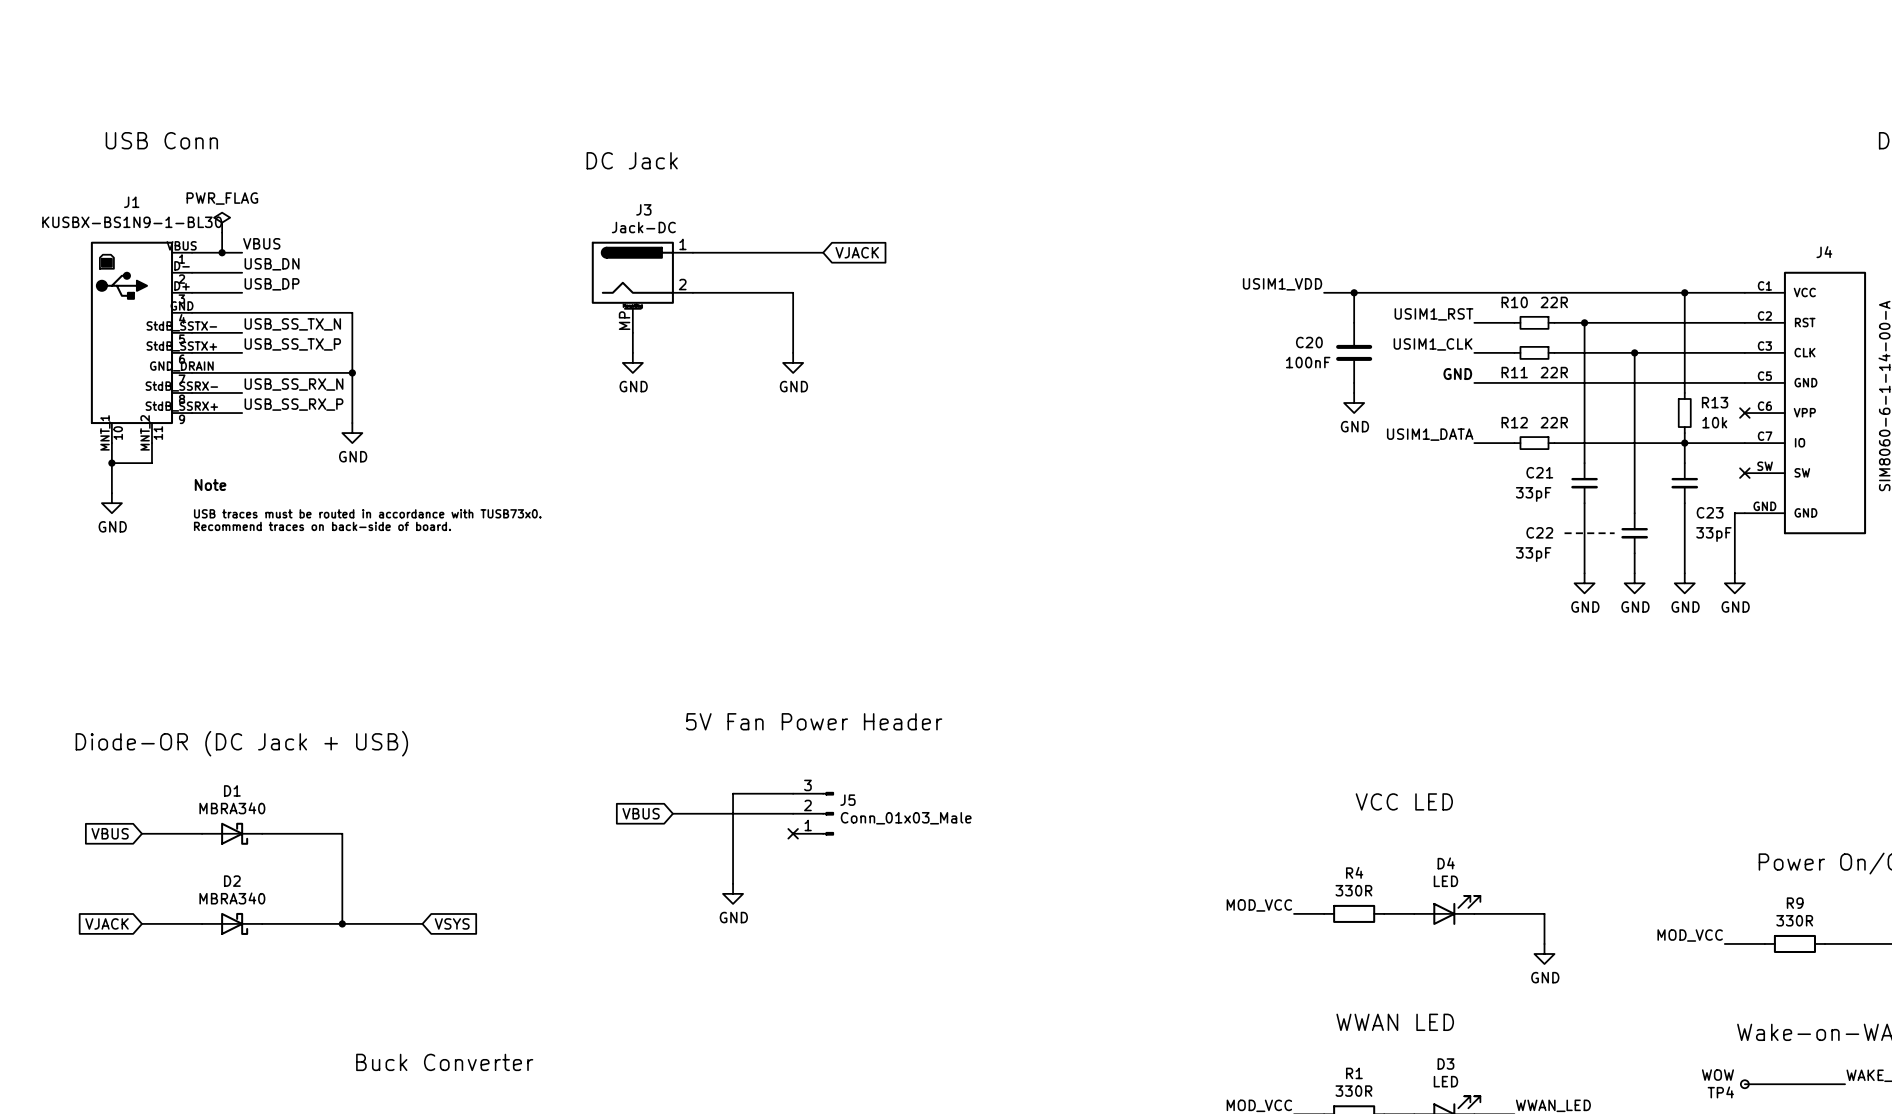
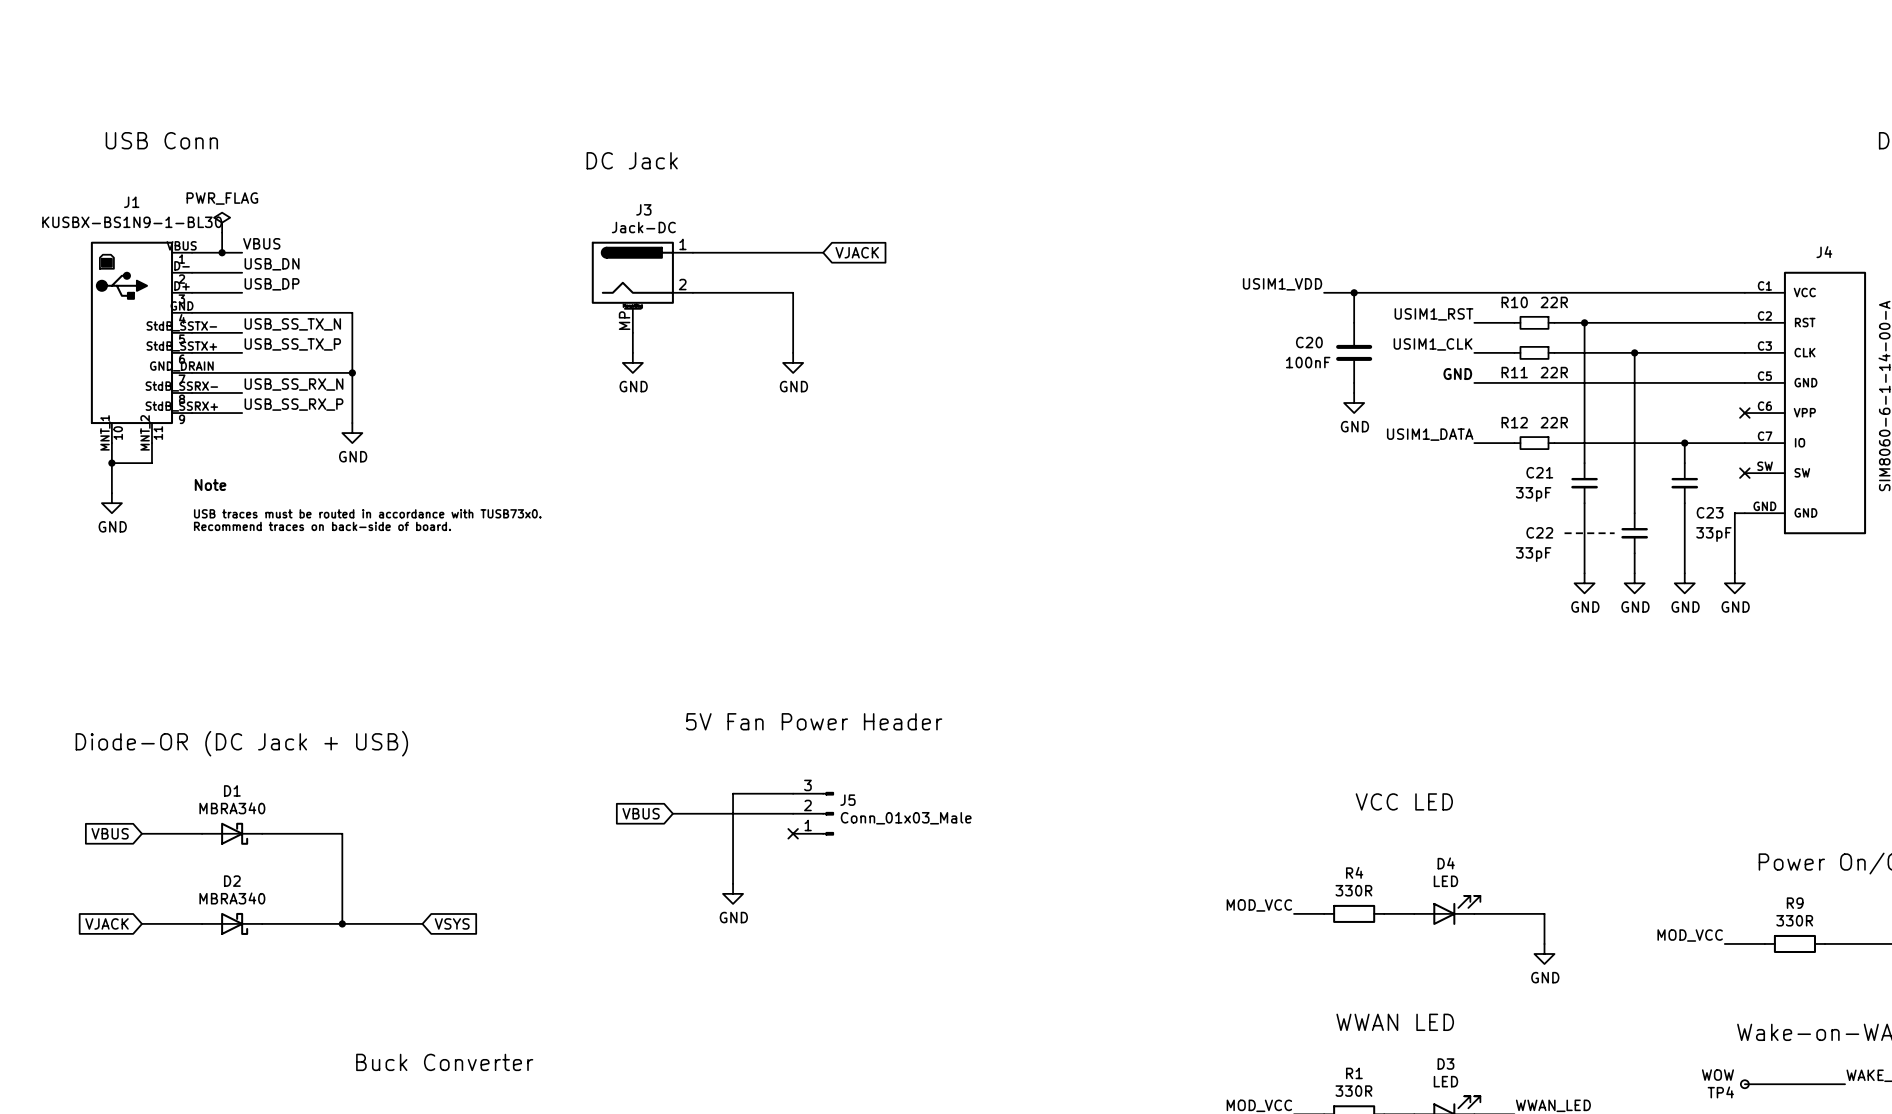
wire: (1684, 292) (1684, 392) -> none
junction: (1684, 292) -> none
R13: 10k (1684, 413) -> none
wire: (1684, 433) (1684, 443) -> none

